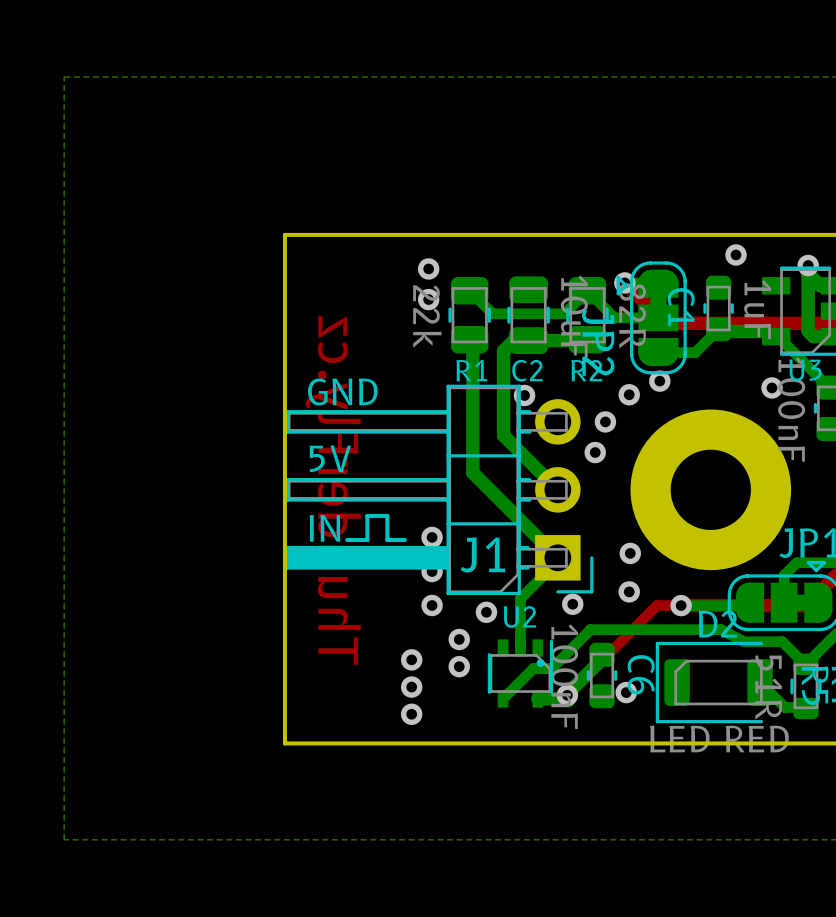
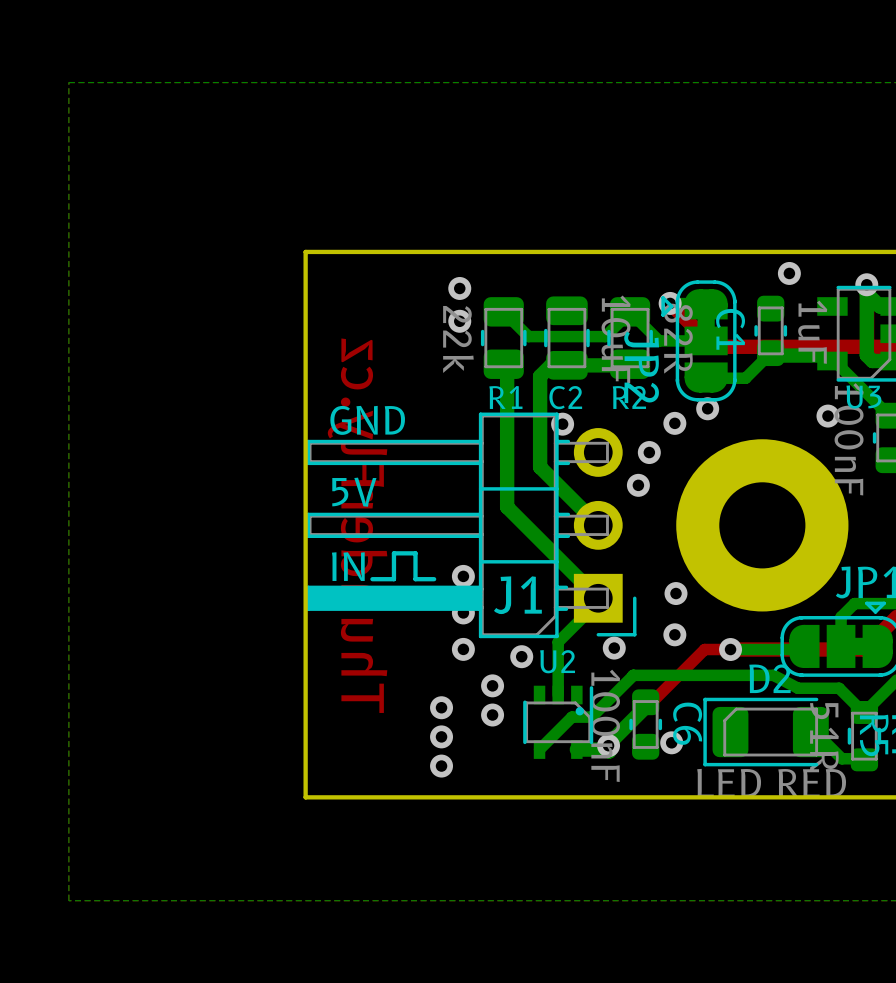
D2 footprint: [655, 641, 773, 724] -> [703, 697, 829, 767]

